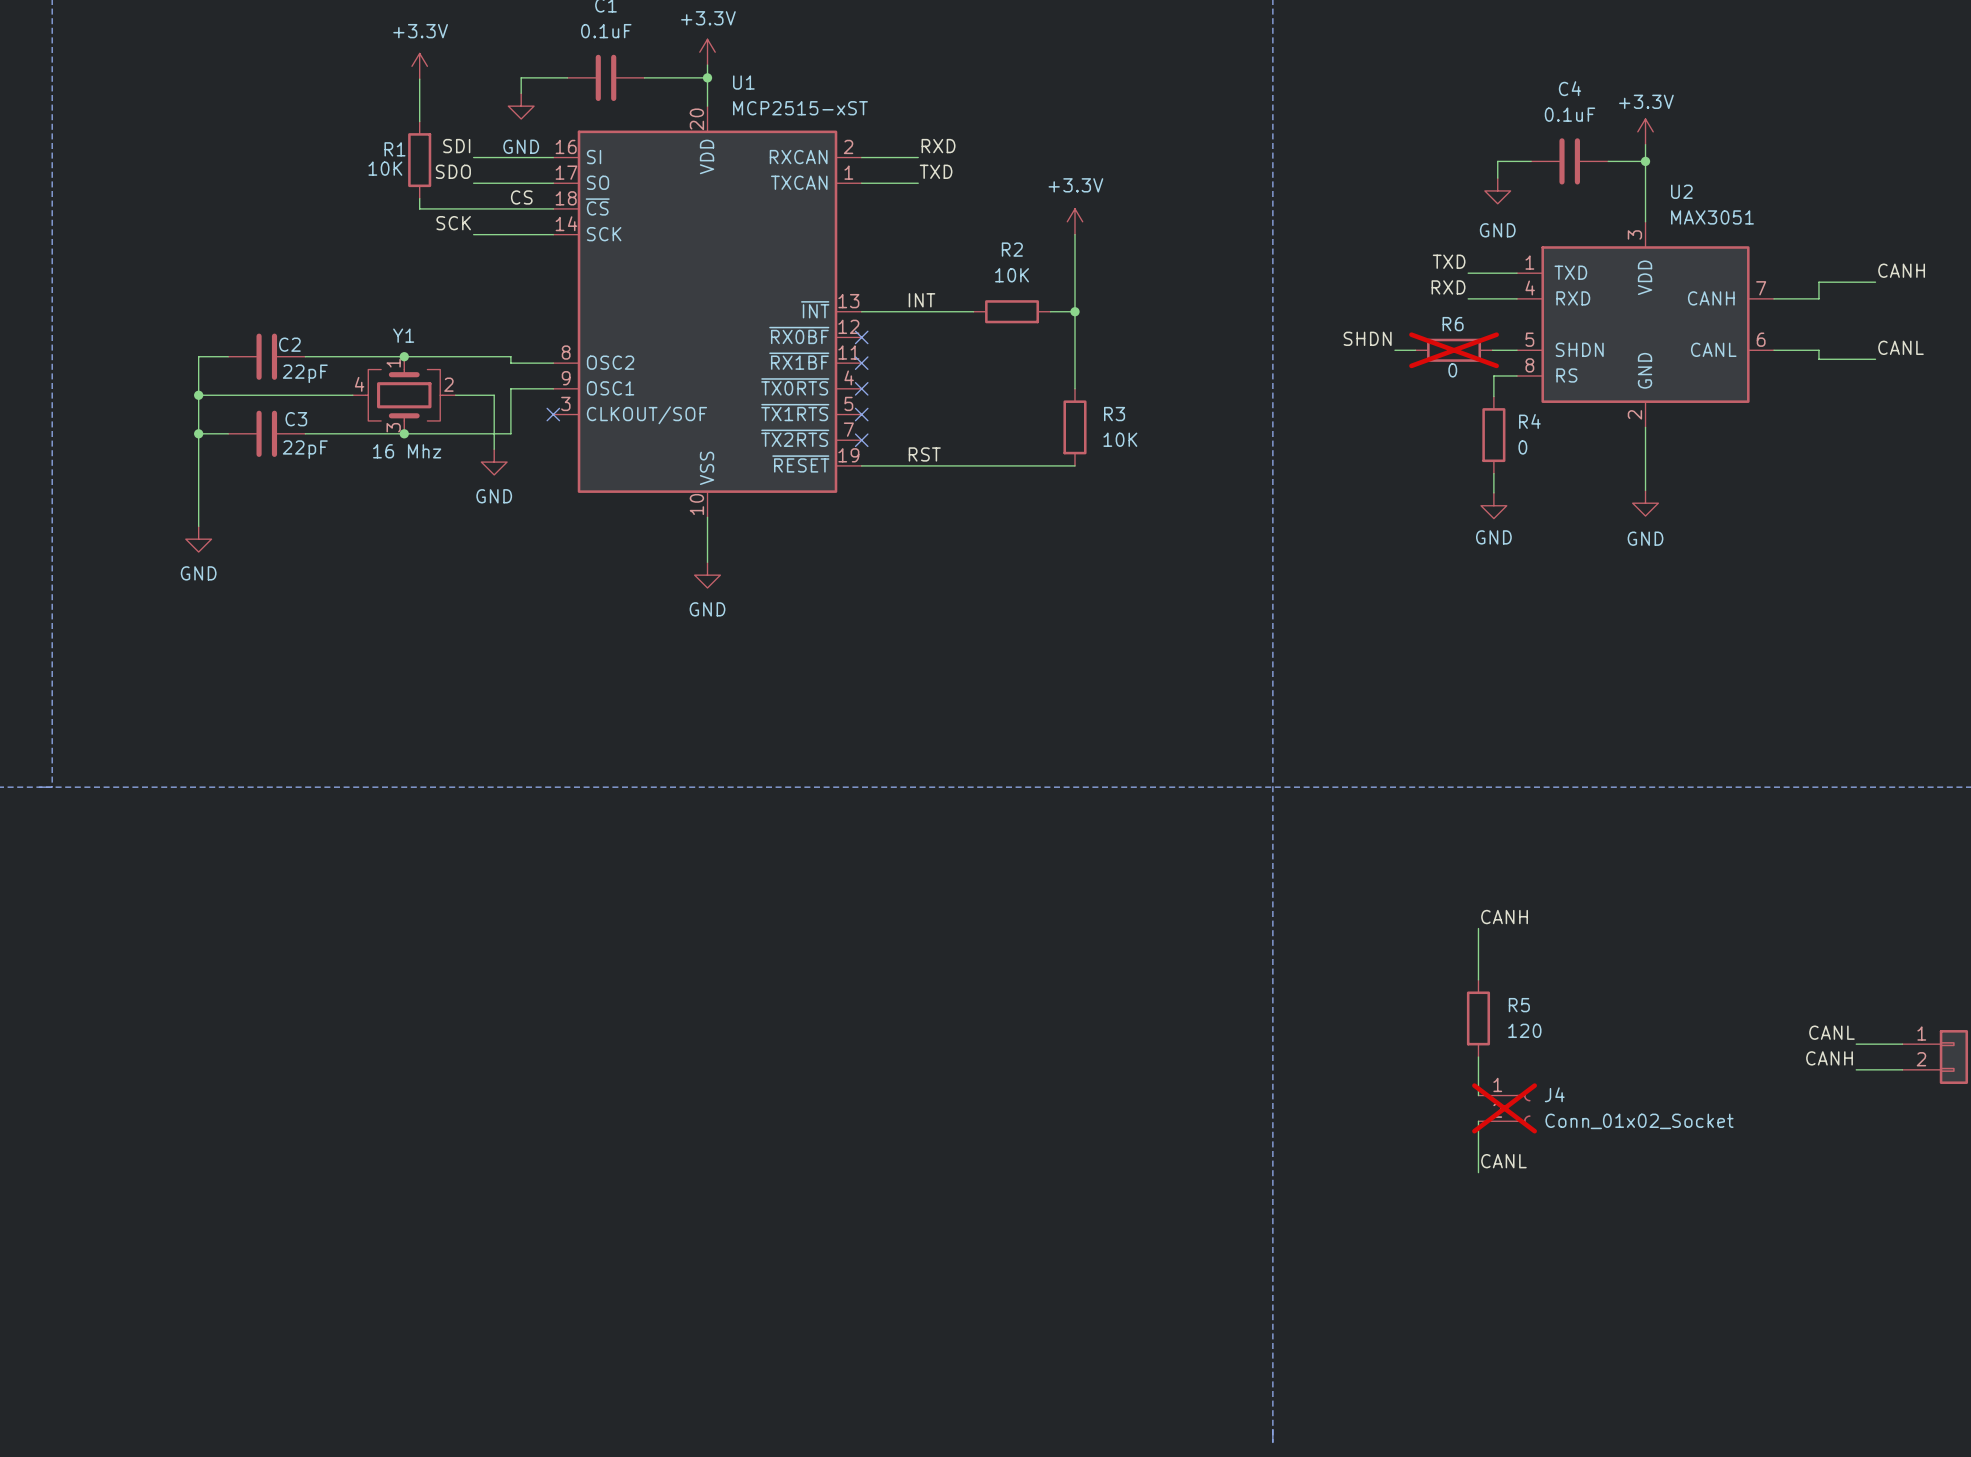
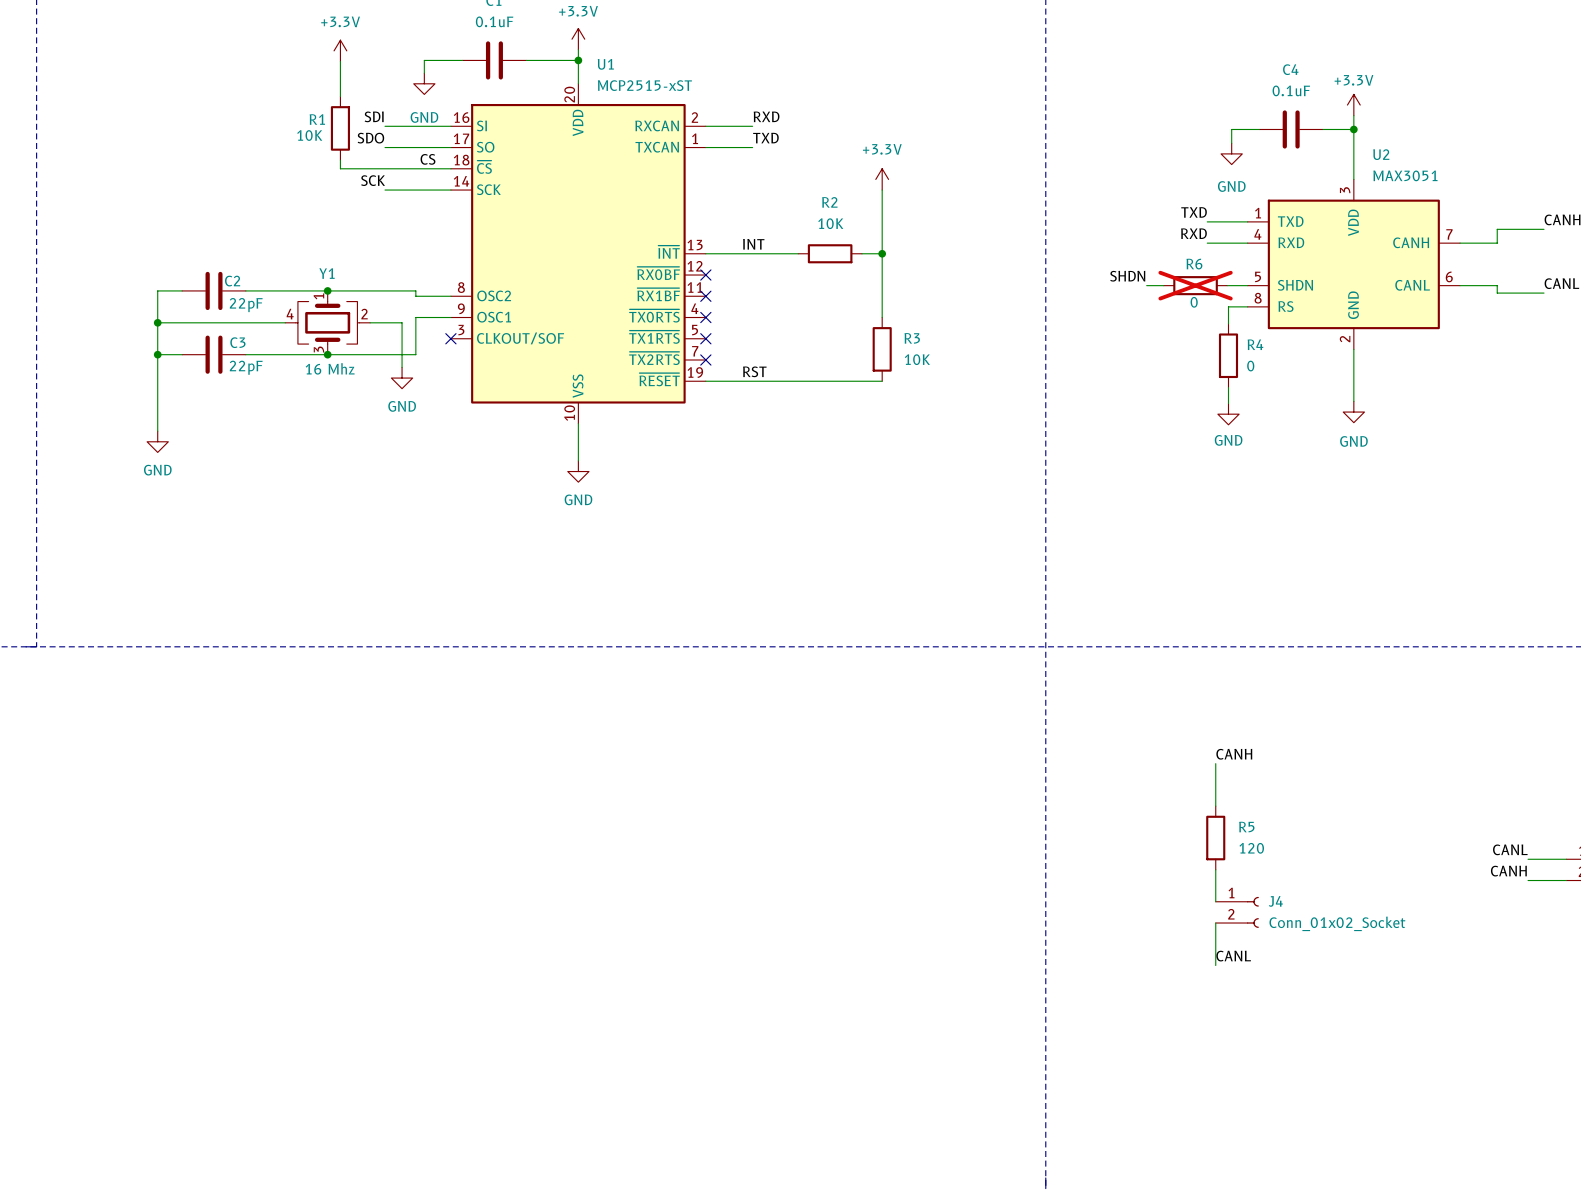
J4 do-not-place cross: (1504, 1108) -> none

